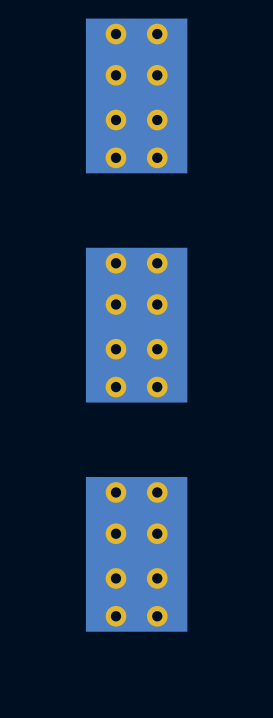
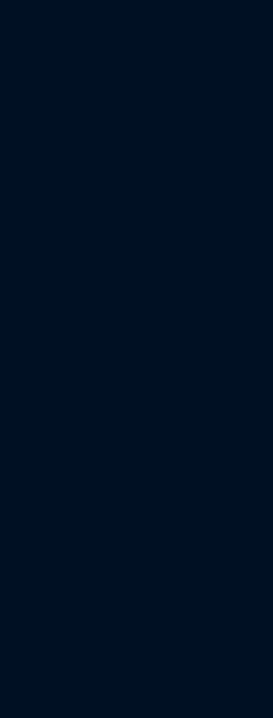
part: (136, 95) -> none
part: (136, 325) -> none
part: (136, 554) -> none

